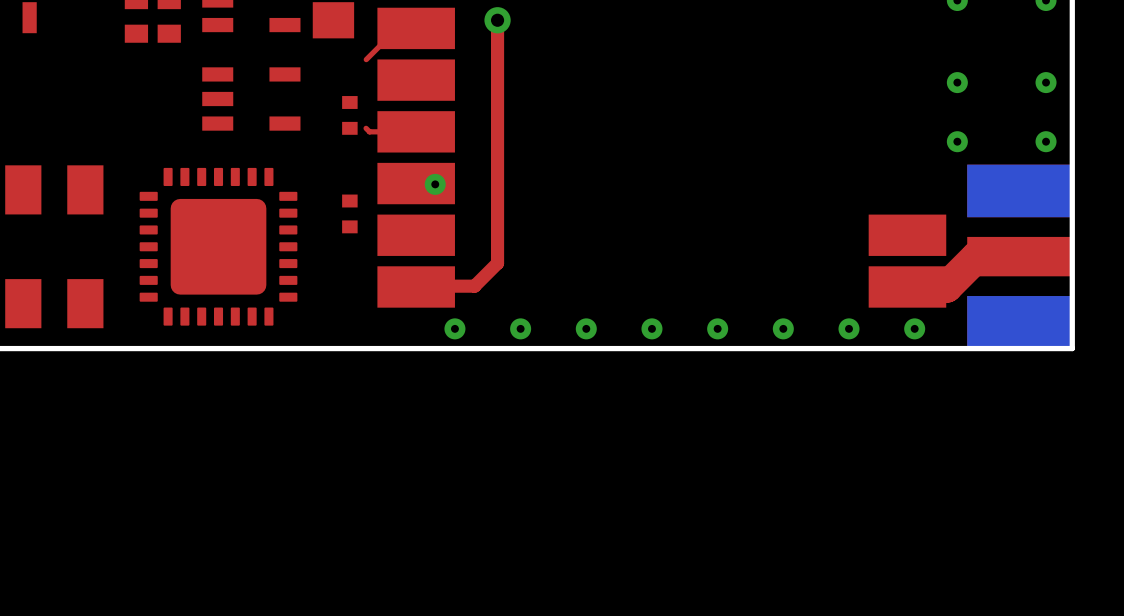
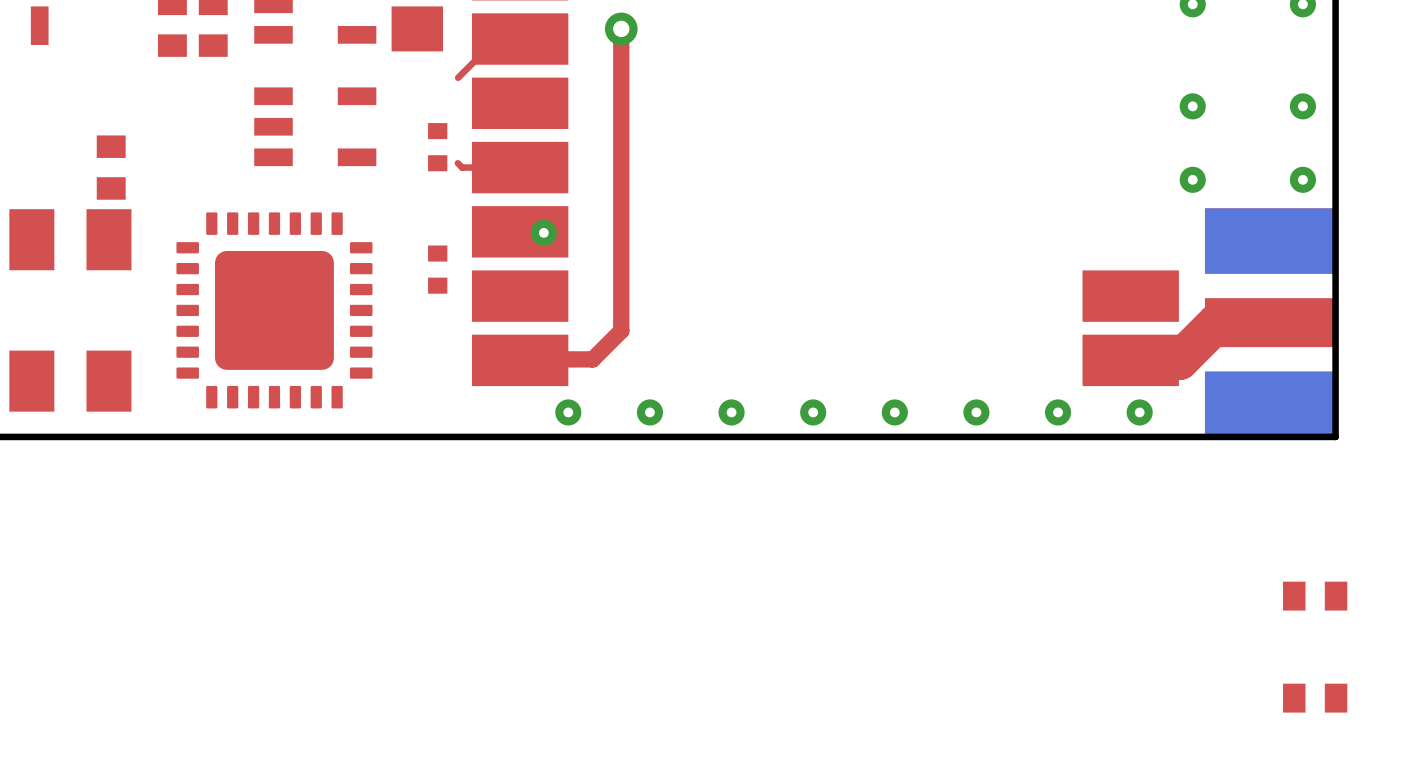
part: none -> (111, 167)
part: none -> (1315, 596)
part: none -> (1315, 698)

